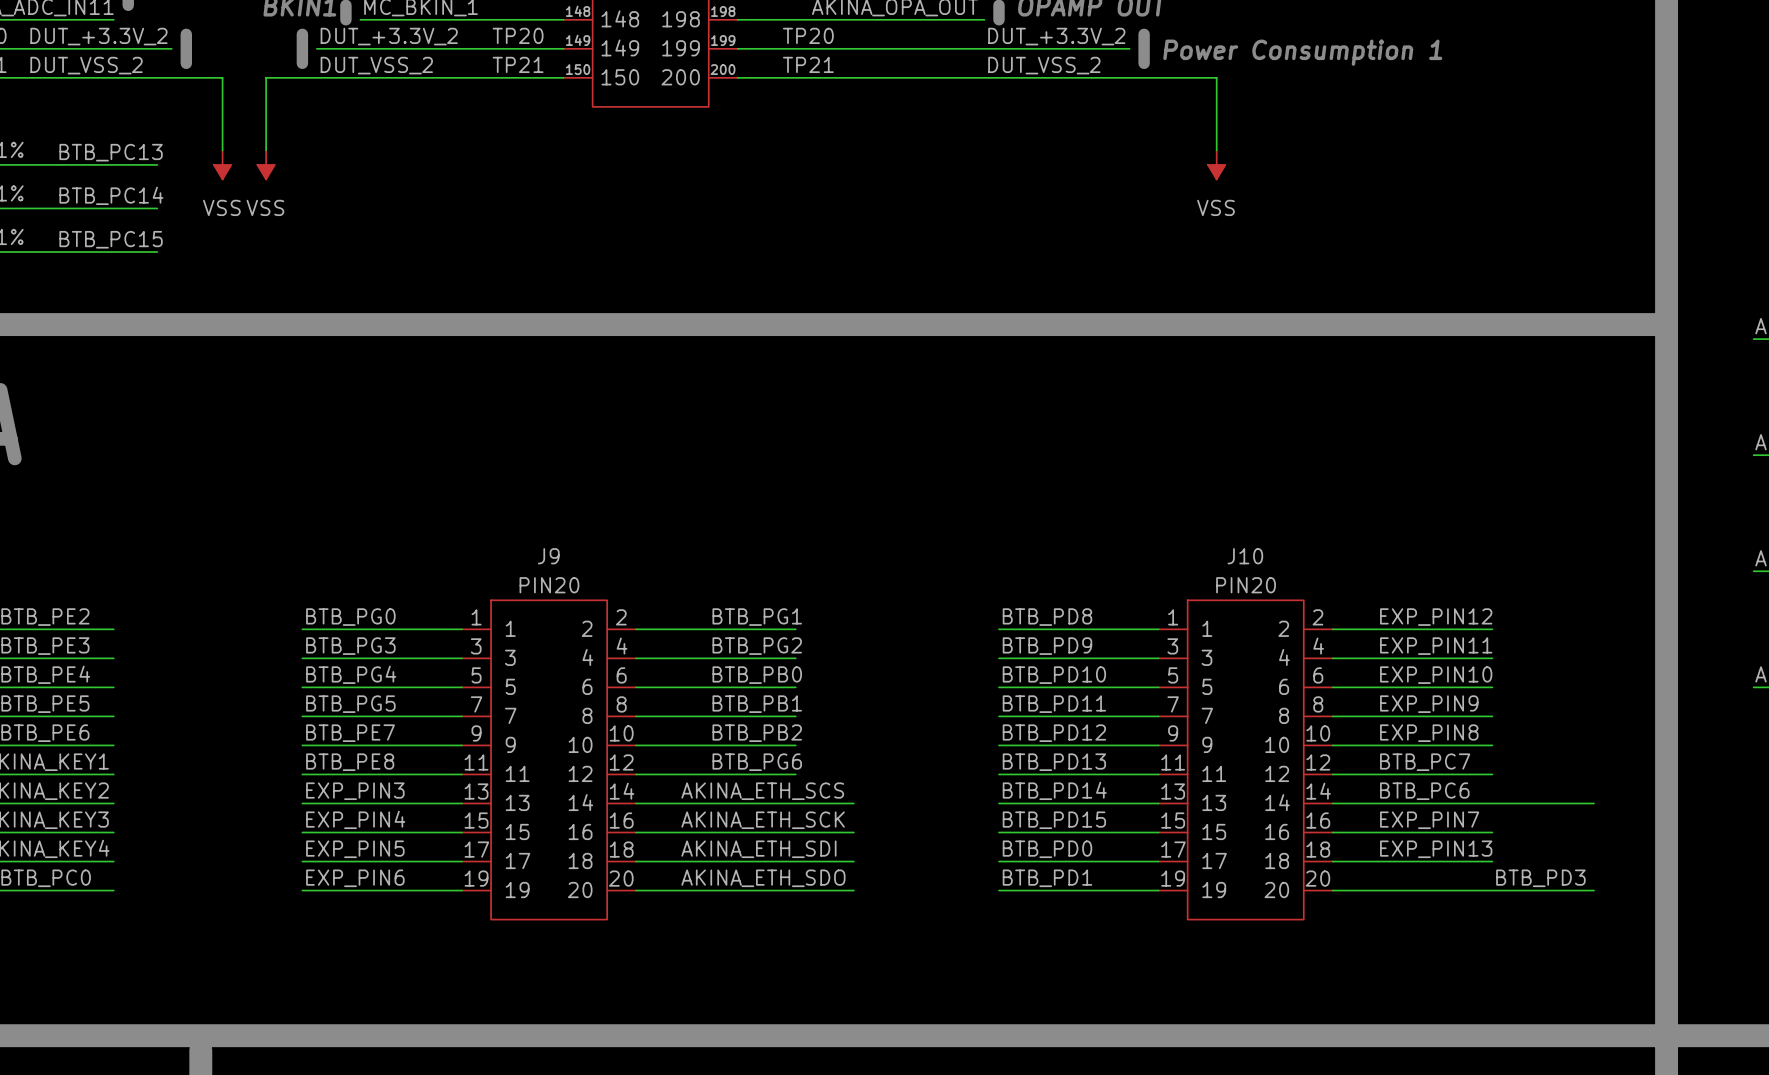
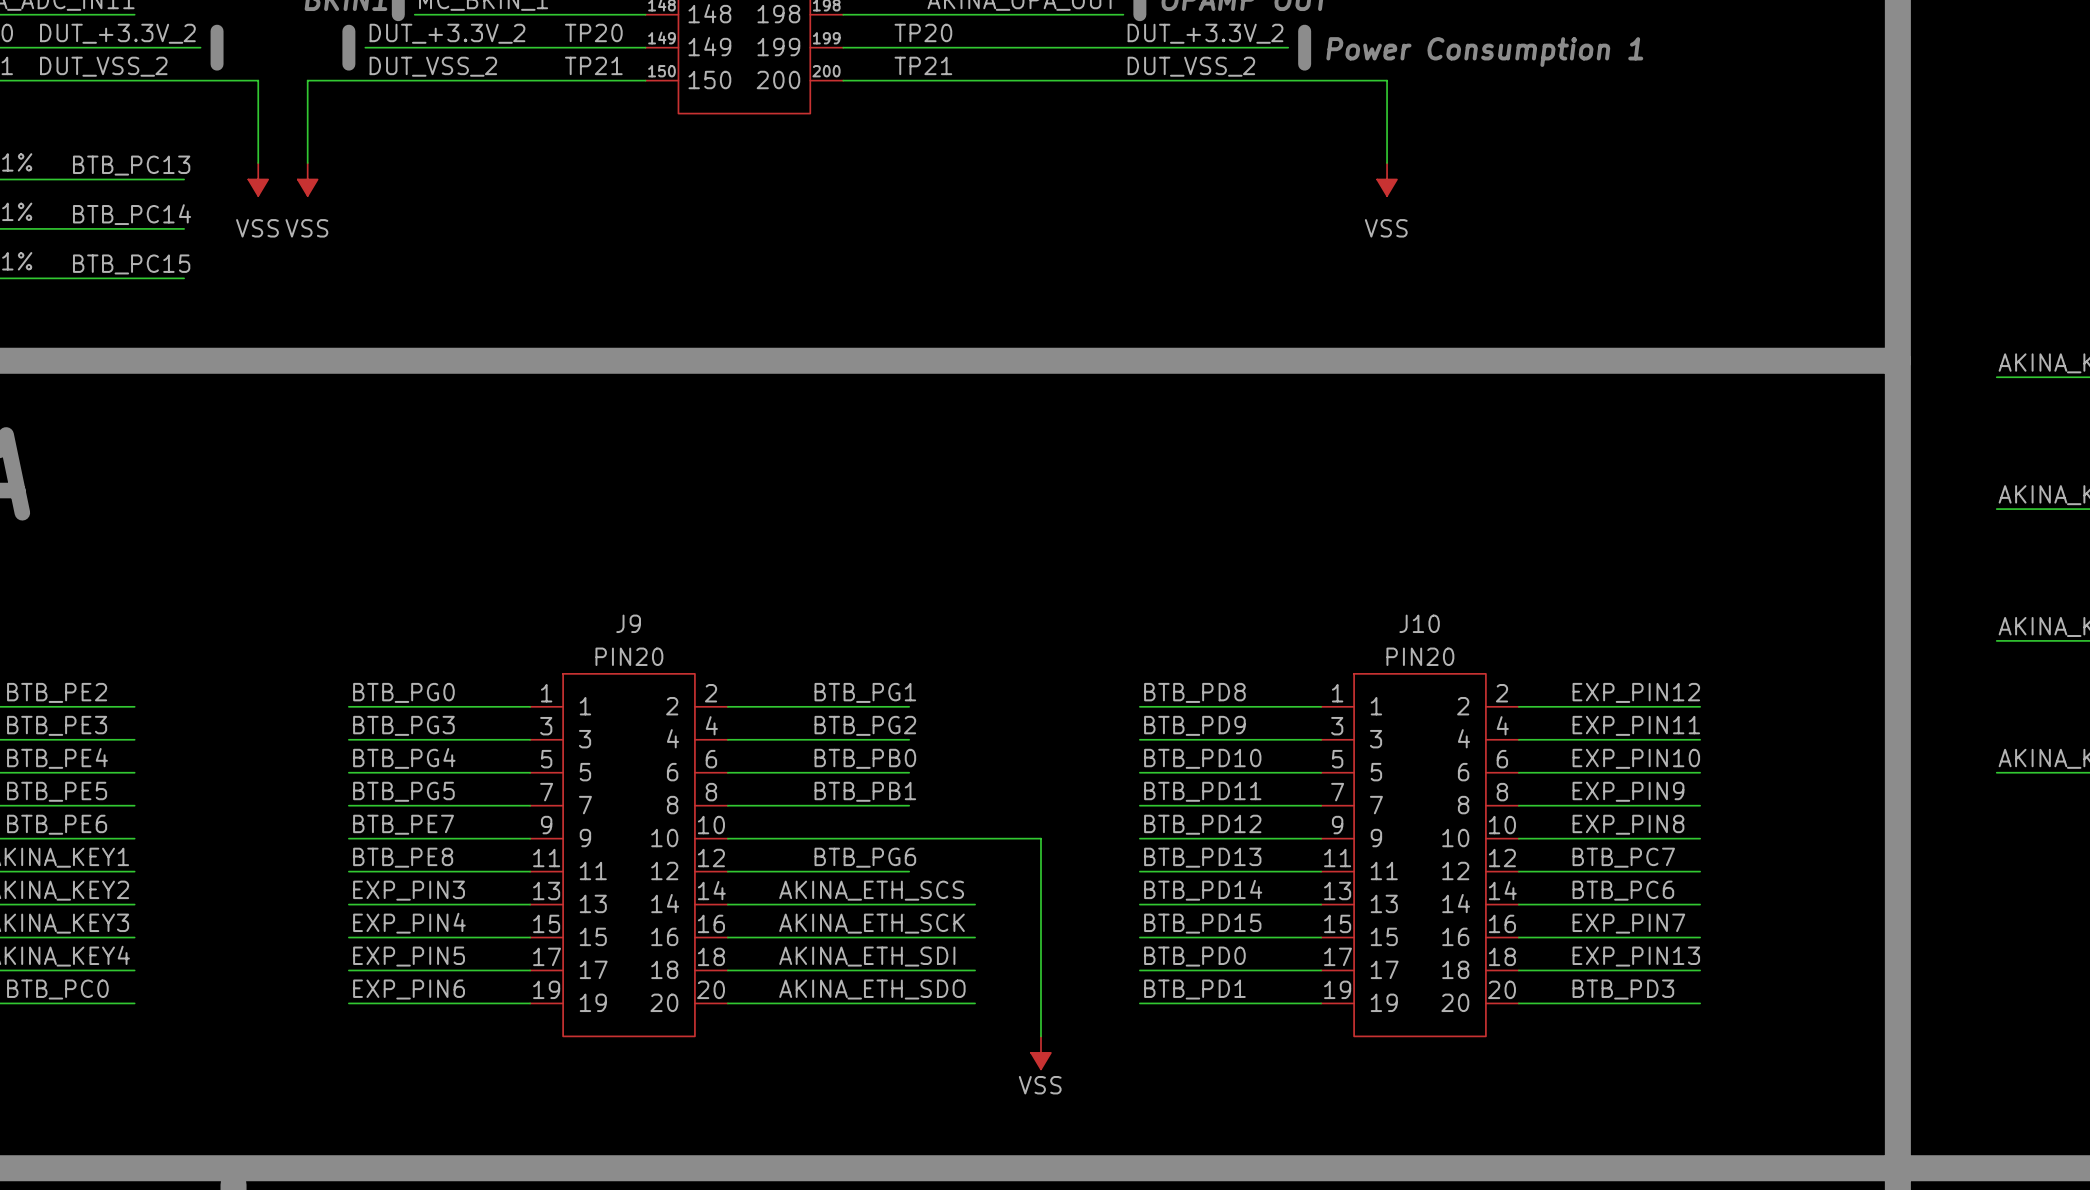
label: BTB_PB2 (757, 733) -> none
wire: none -> (909, 838) (1040, 838) (1040, 1036)
wire: (1492, 803) (1594, 803) -> none
label position: BTB_PD3 (1540, 878) -> BTB_PD3 (1623, 989)
wire: (1492, 890) (1594, 890) -> none
power symbol: none -> VSS (1040, 1052)

